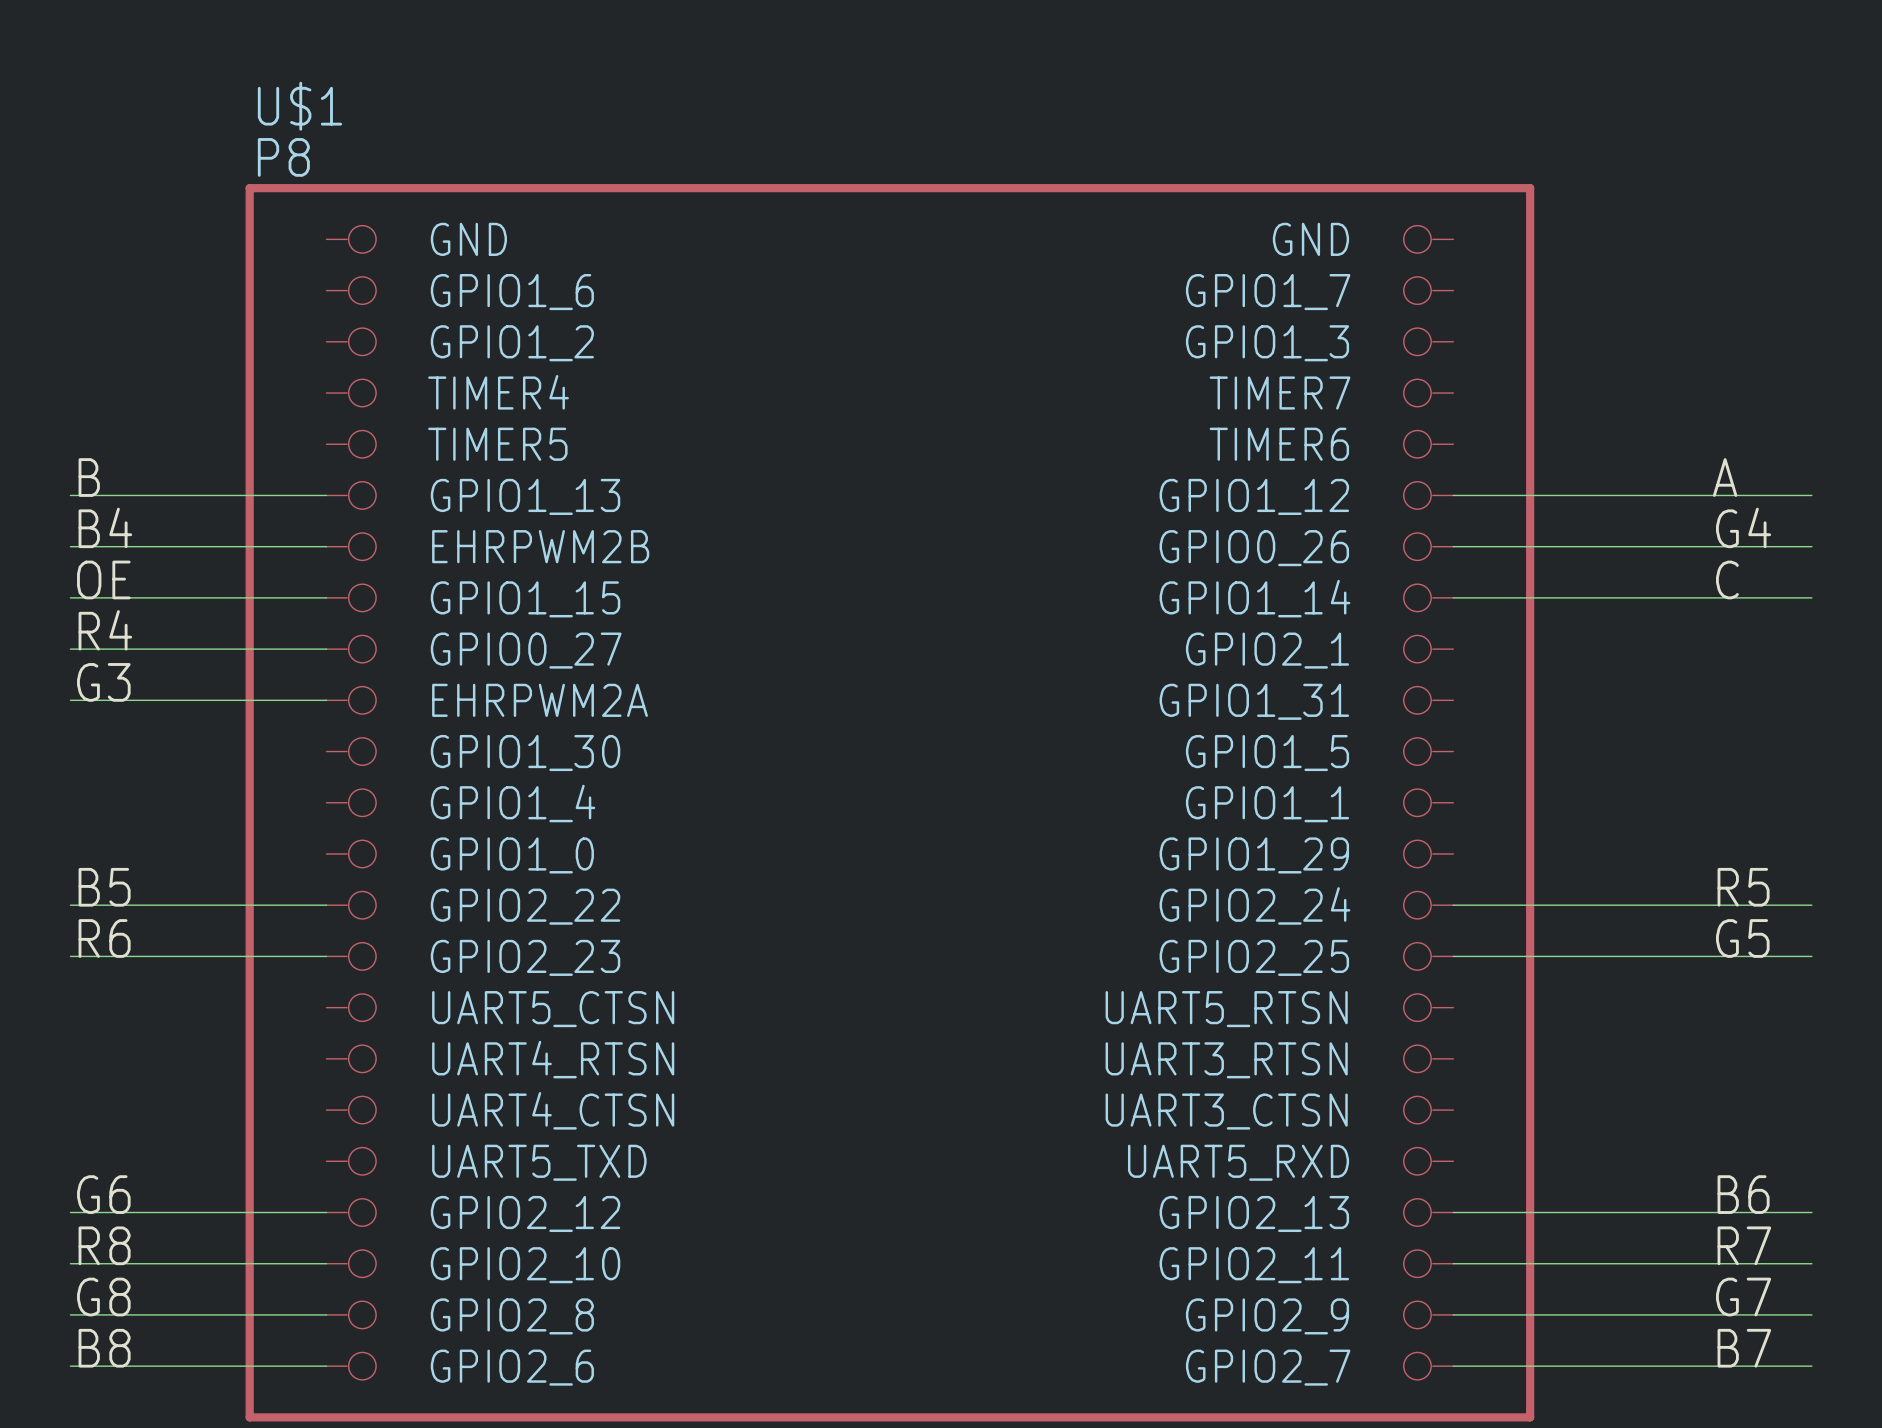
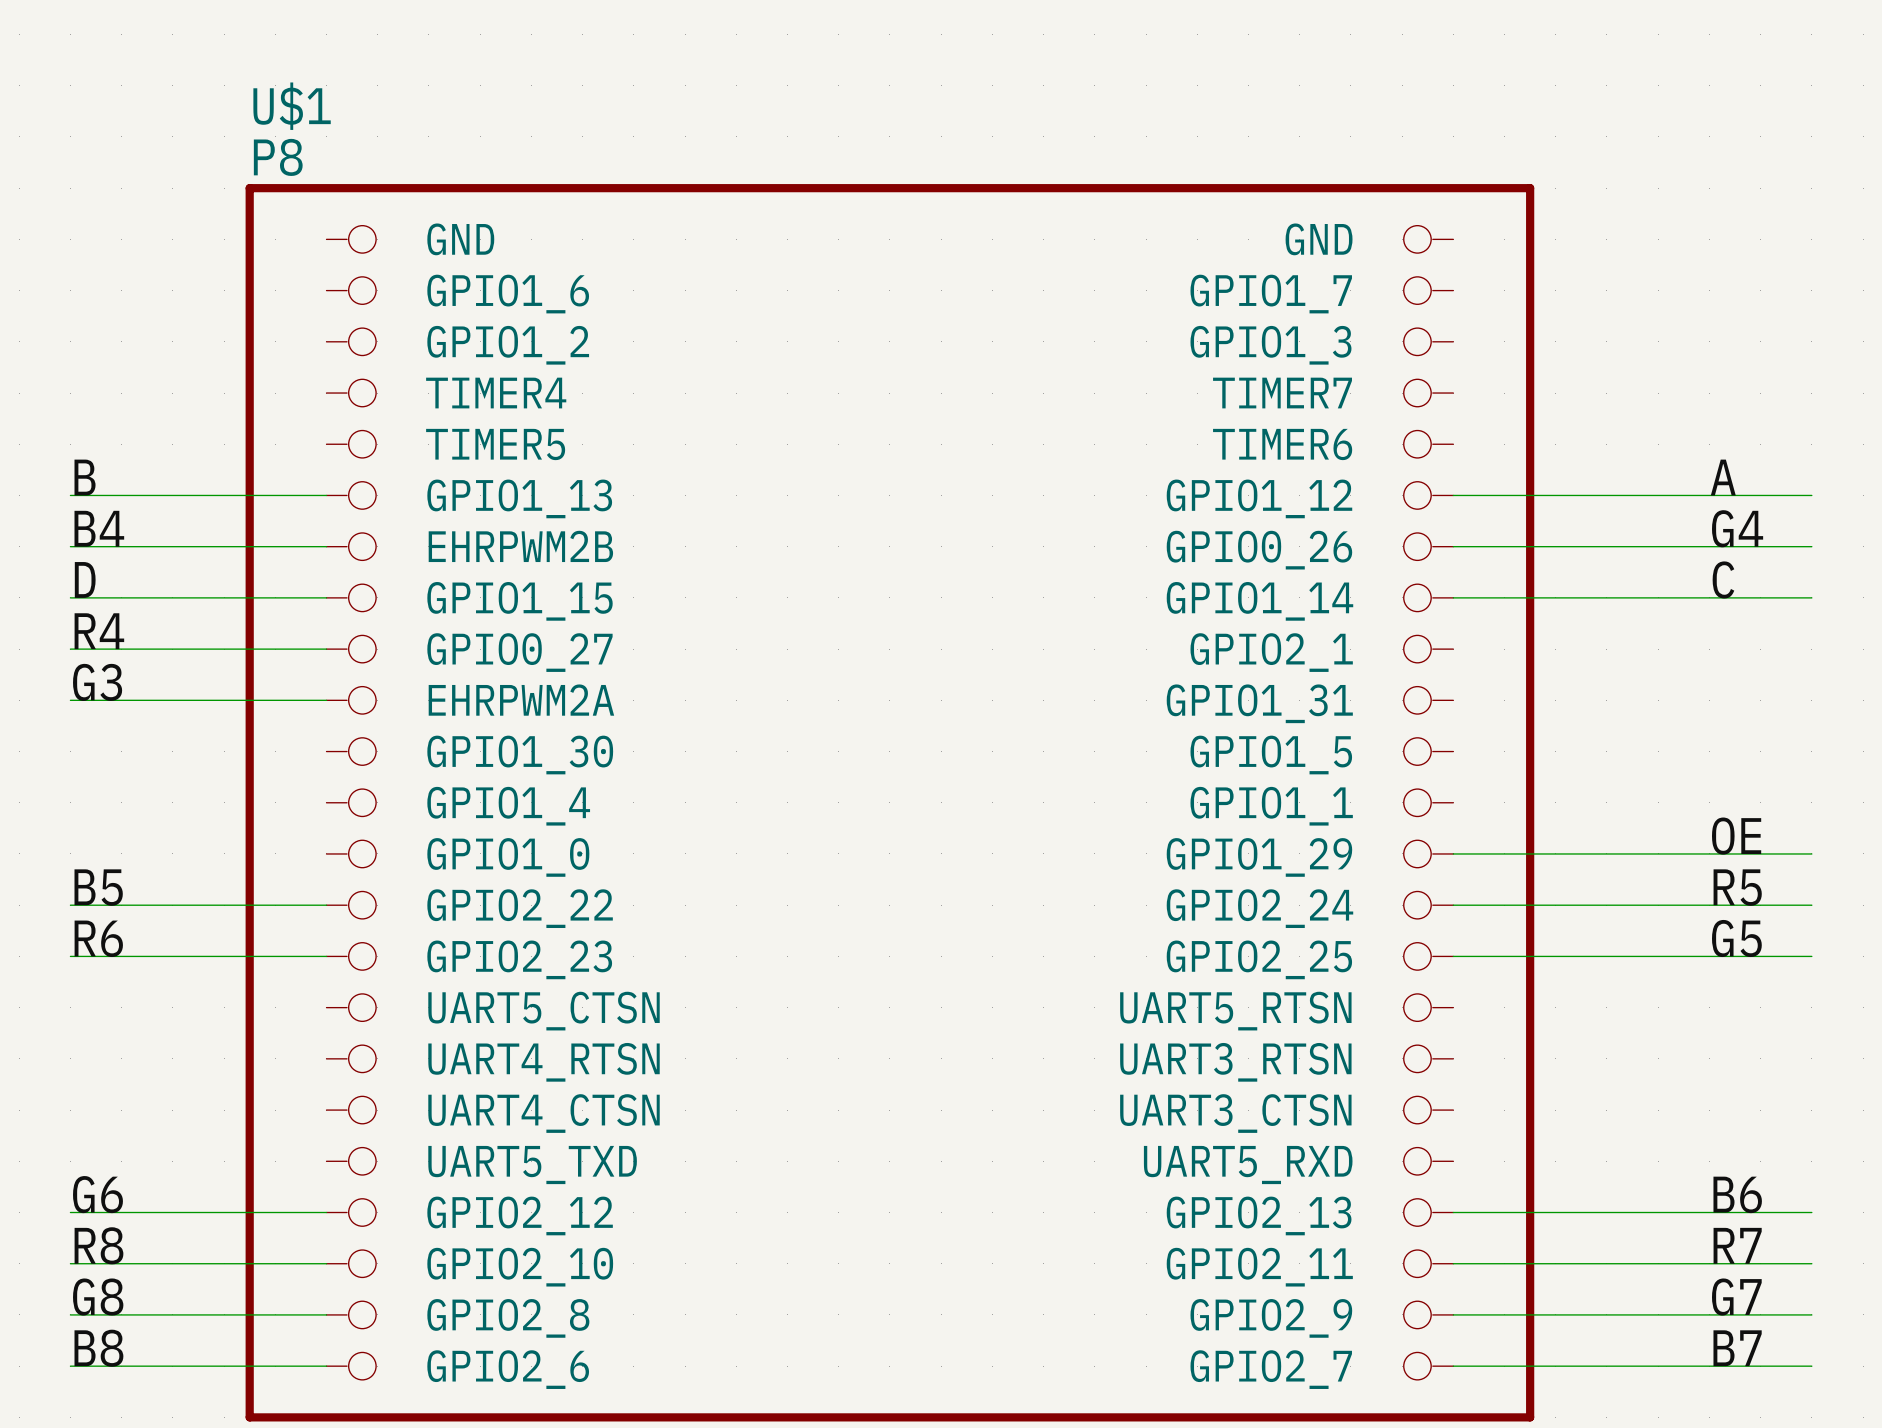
label: OE (103, 579) -> D (85, 579)
label: none -> OE (1736, 836)
wire: none -> (1453, 853) (1811, 853)

